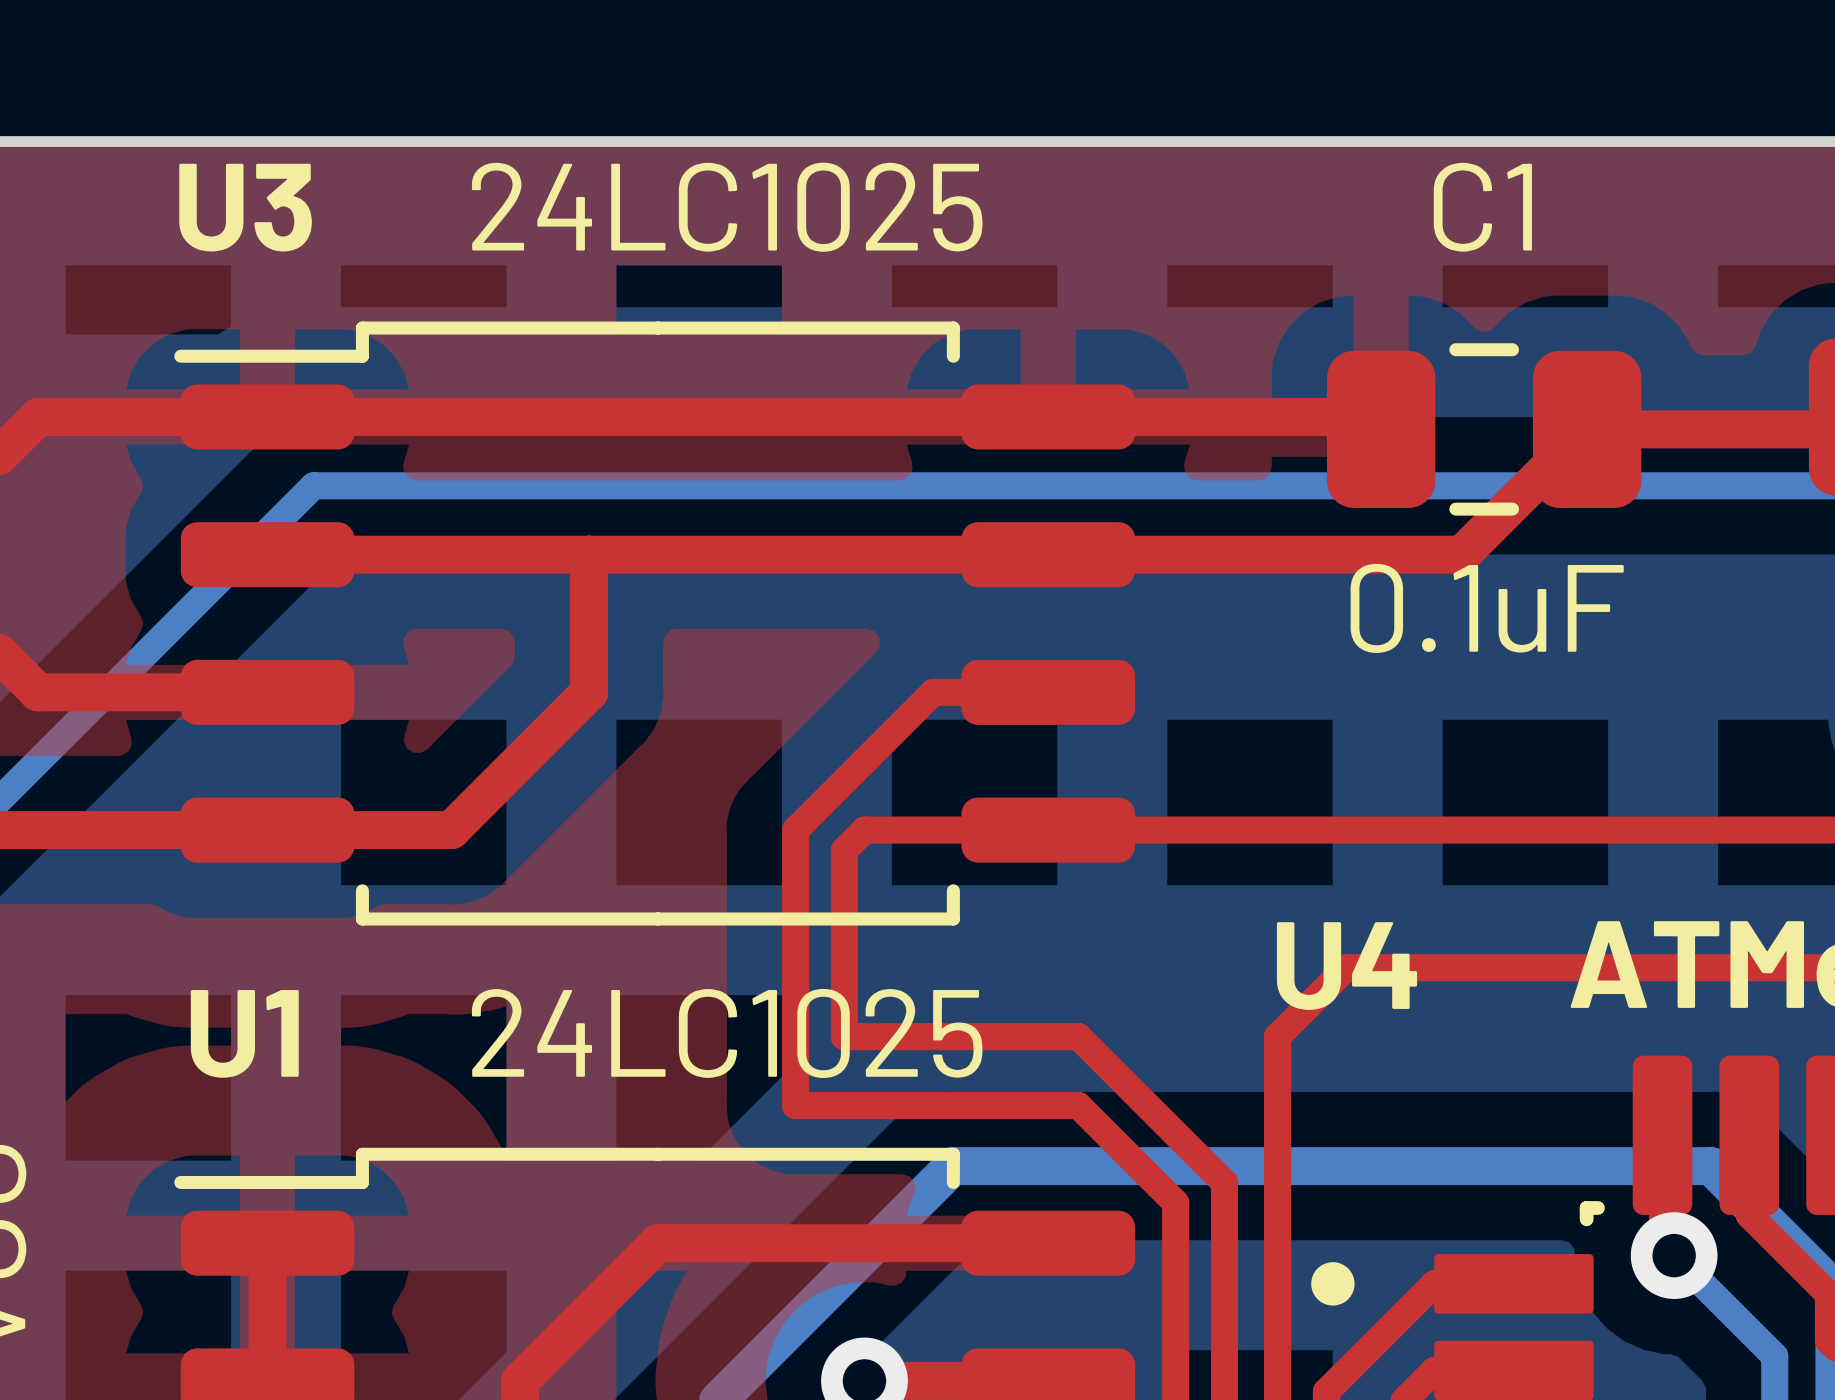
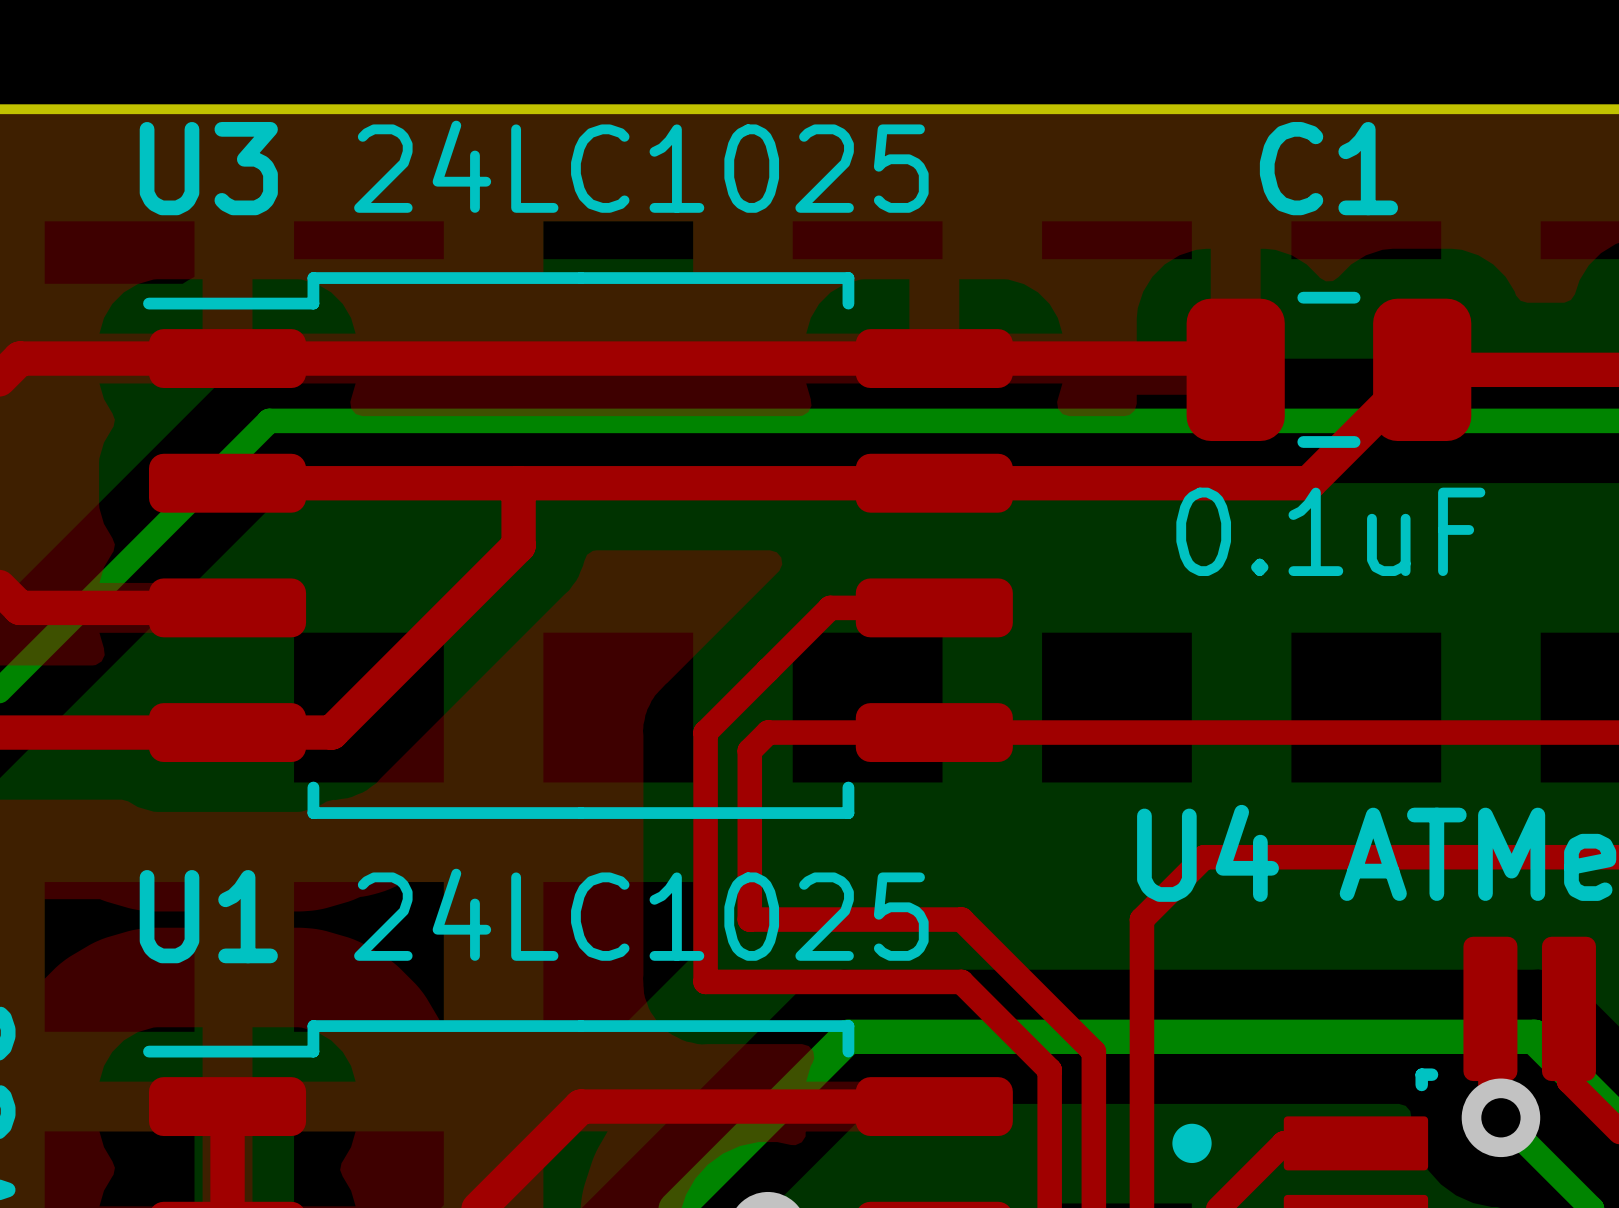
top track: (589, 623) (589, 692) (451, 830) (382, 830) -> (518, 545) (331, 732)

